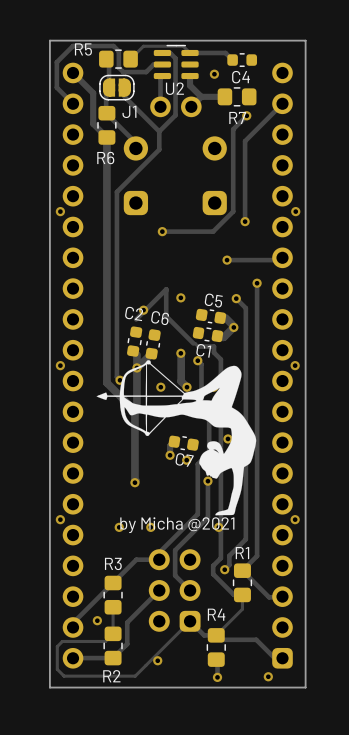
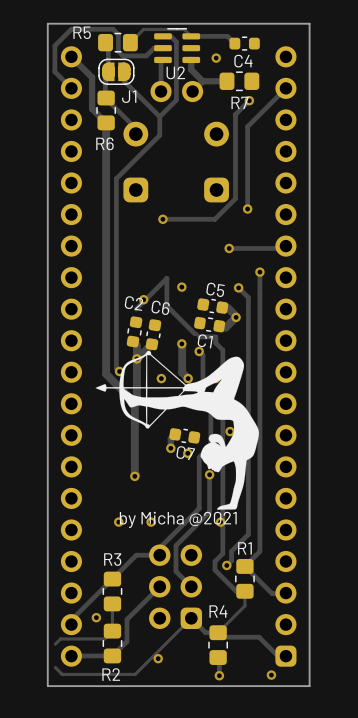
via: (60, 211) -> none
via: (295, 211) -> none
via: (60, 365) -> none
via: (295, 365) -> none
via: (60, 519) -> none
via: (295, 519) -> none
track: (57, 646) (57, 669) -> none

